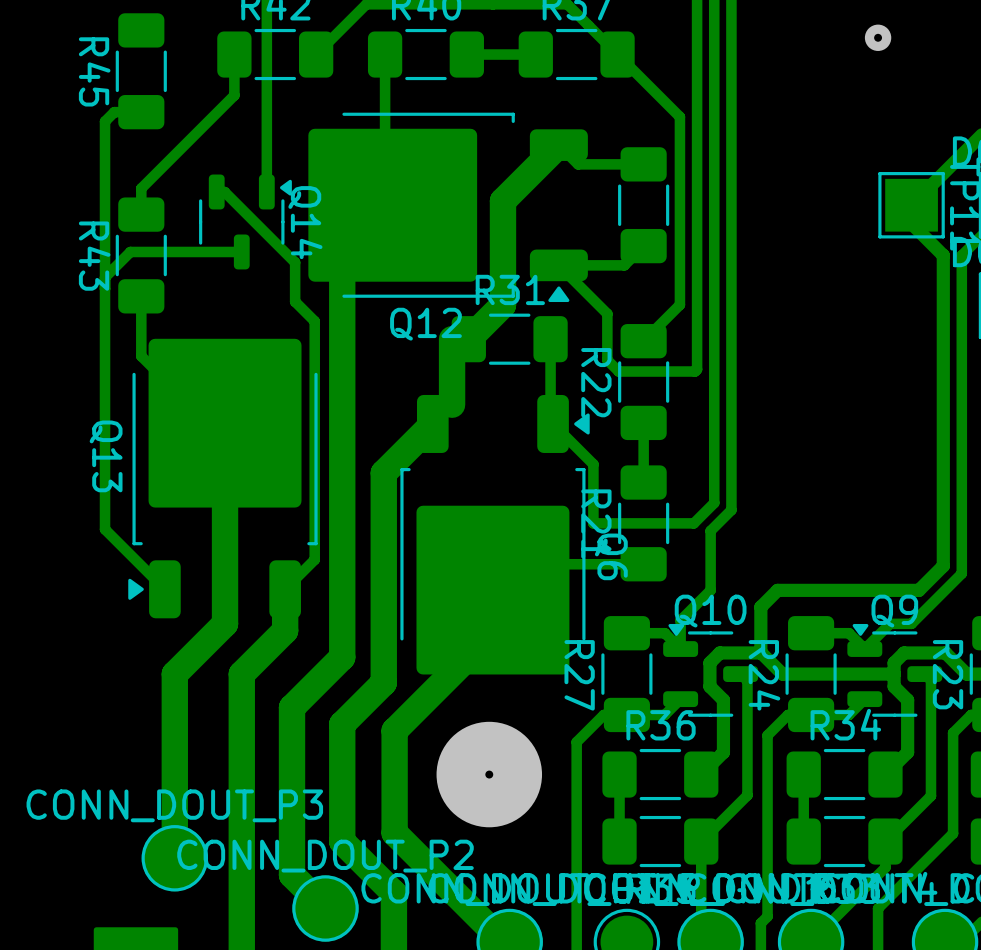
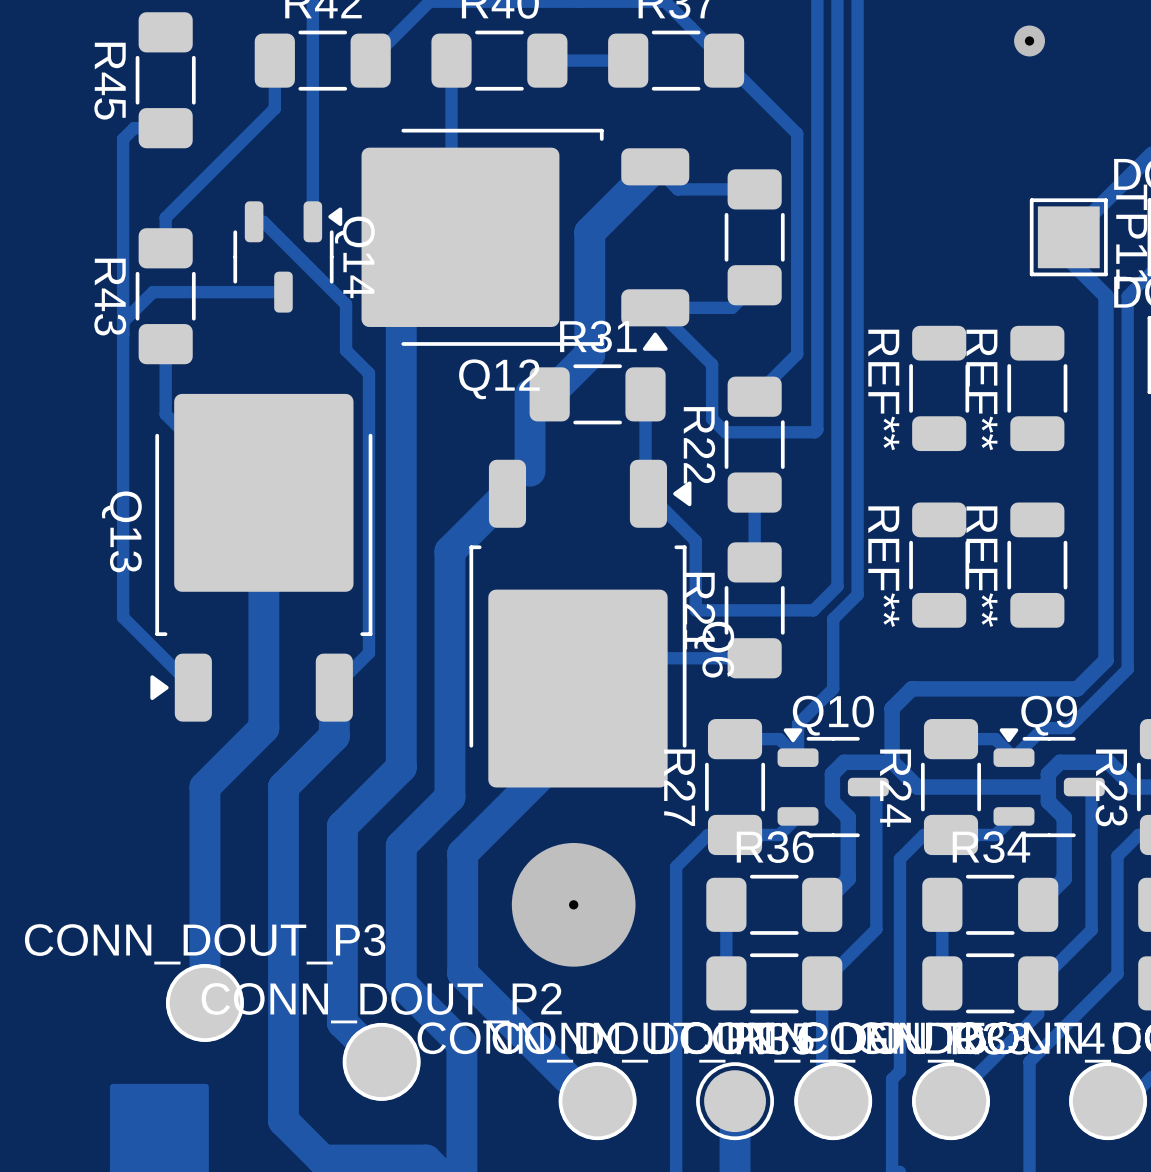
REF**: none -> (939, 388)
REF**: none -> (1037, 388)
REF**: none -> (939, 565)
REF**: none -> (1037, 565)

